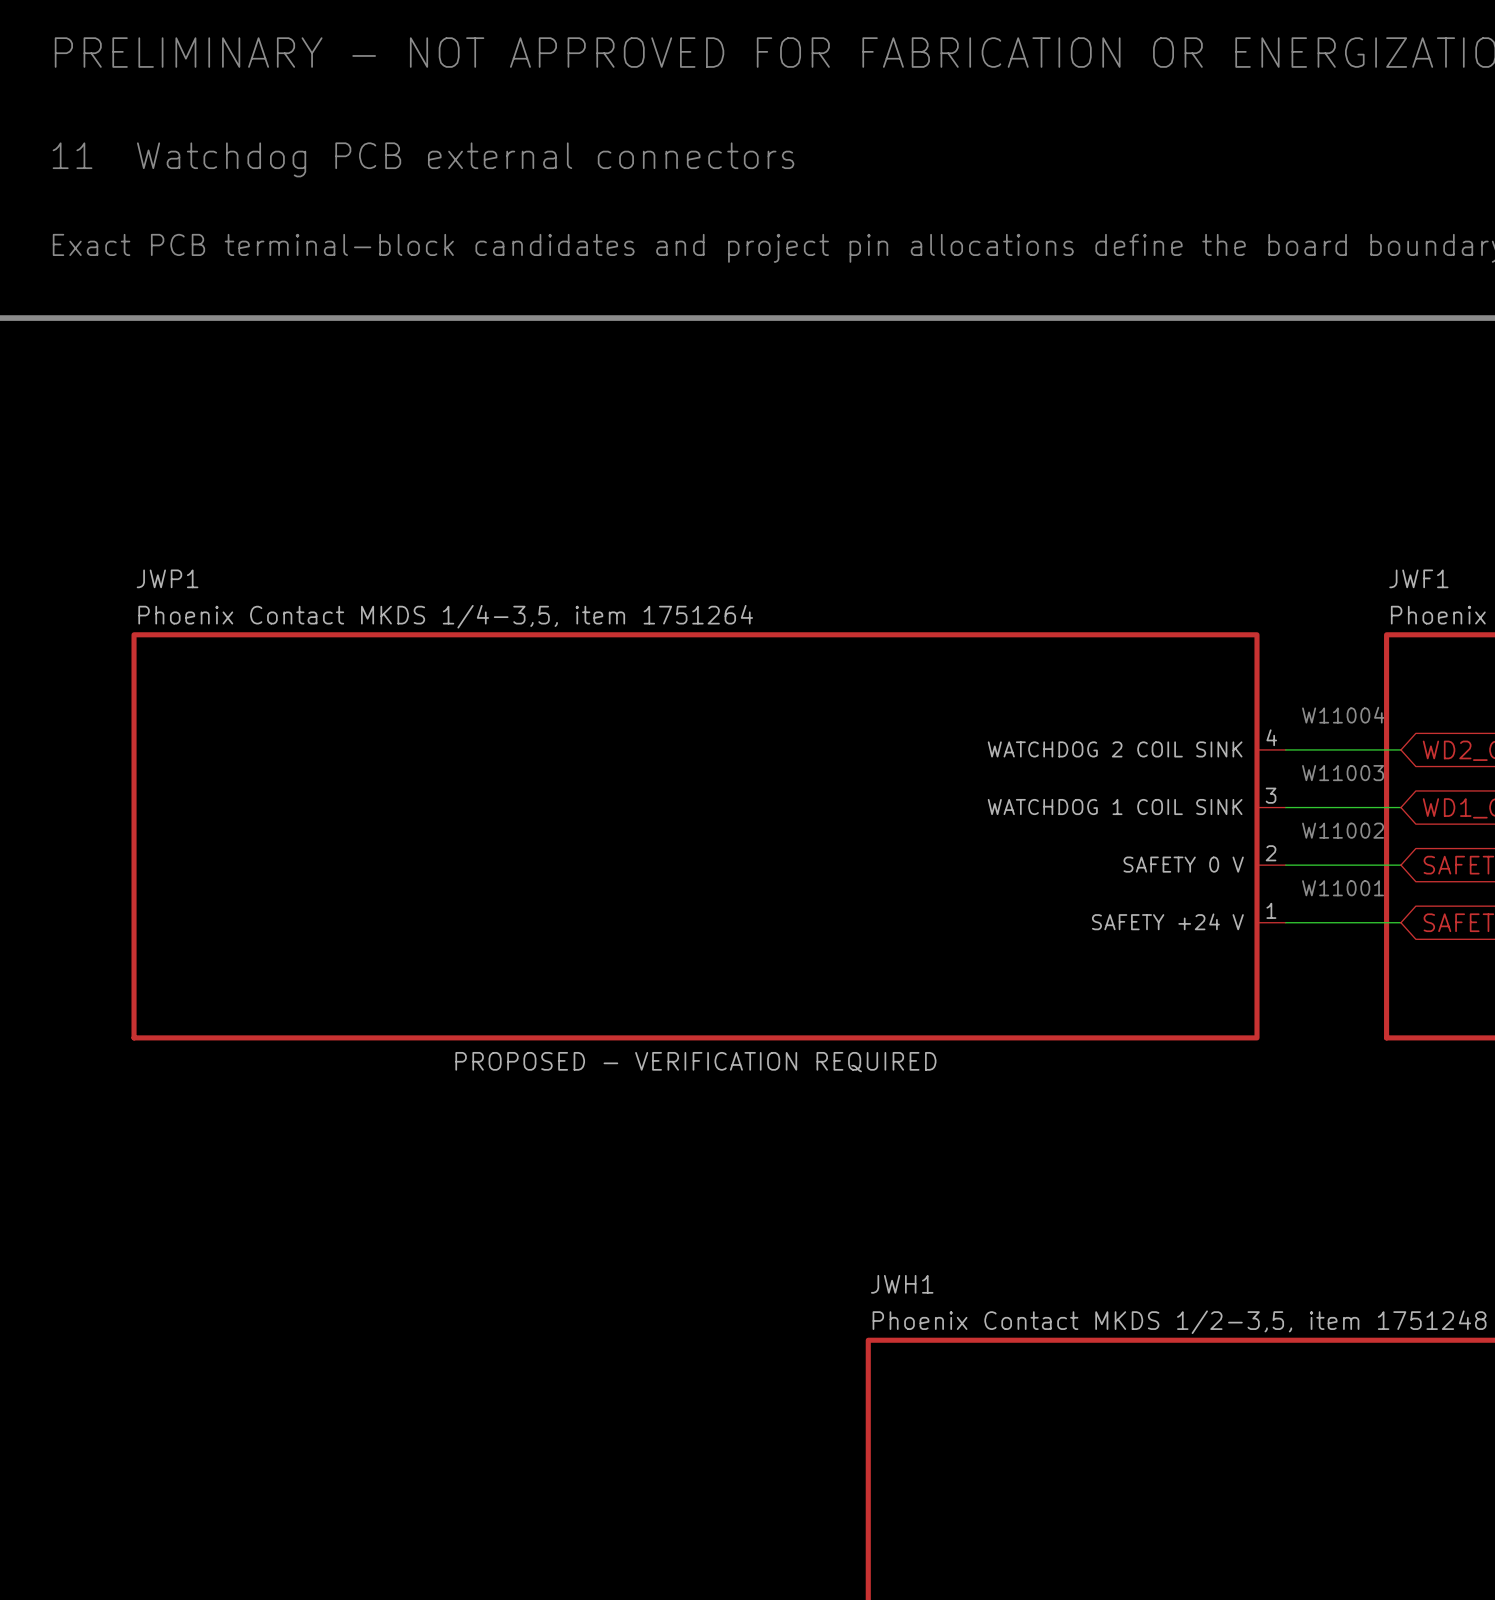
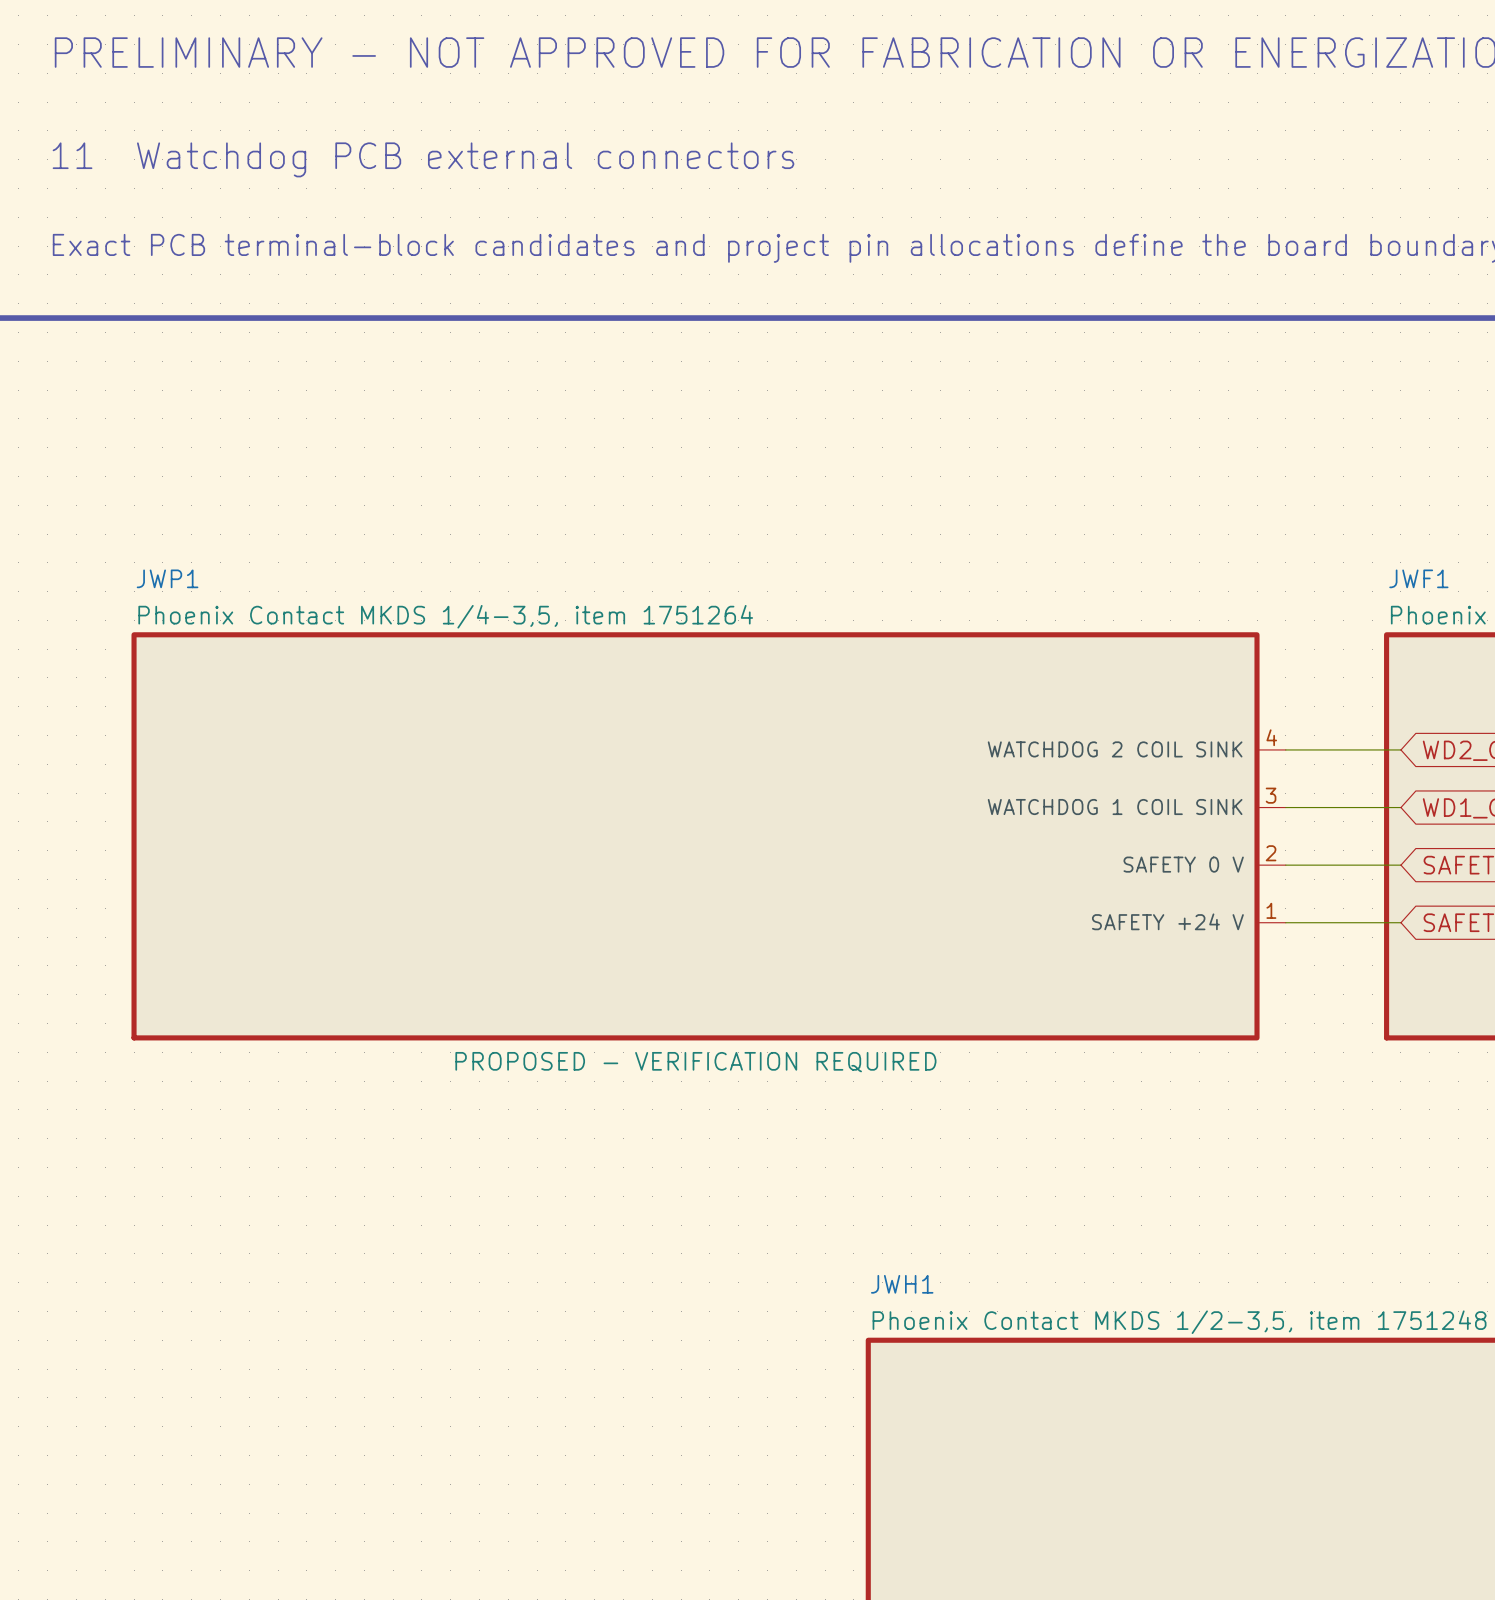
text: W11004 (1343, 715) -> none
text: W11003 (1343, 773) -> none
text: W11002 (1343, 830) -> none
text: W11001 (1343, 888) -> none

